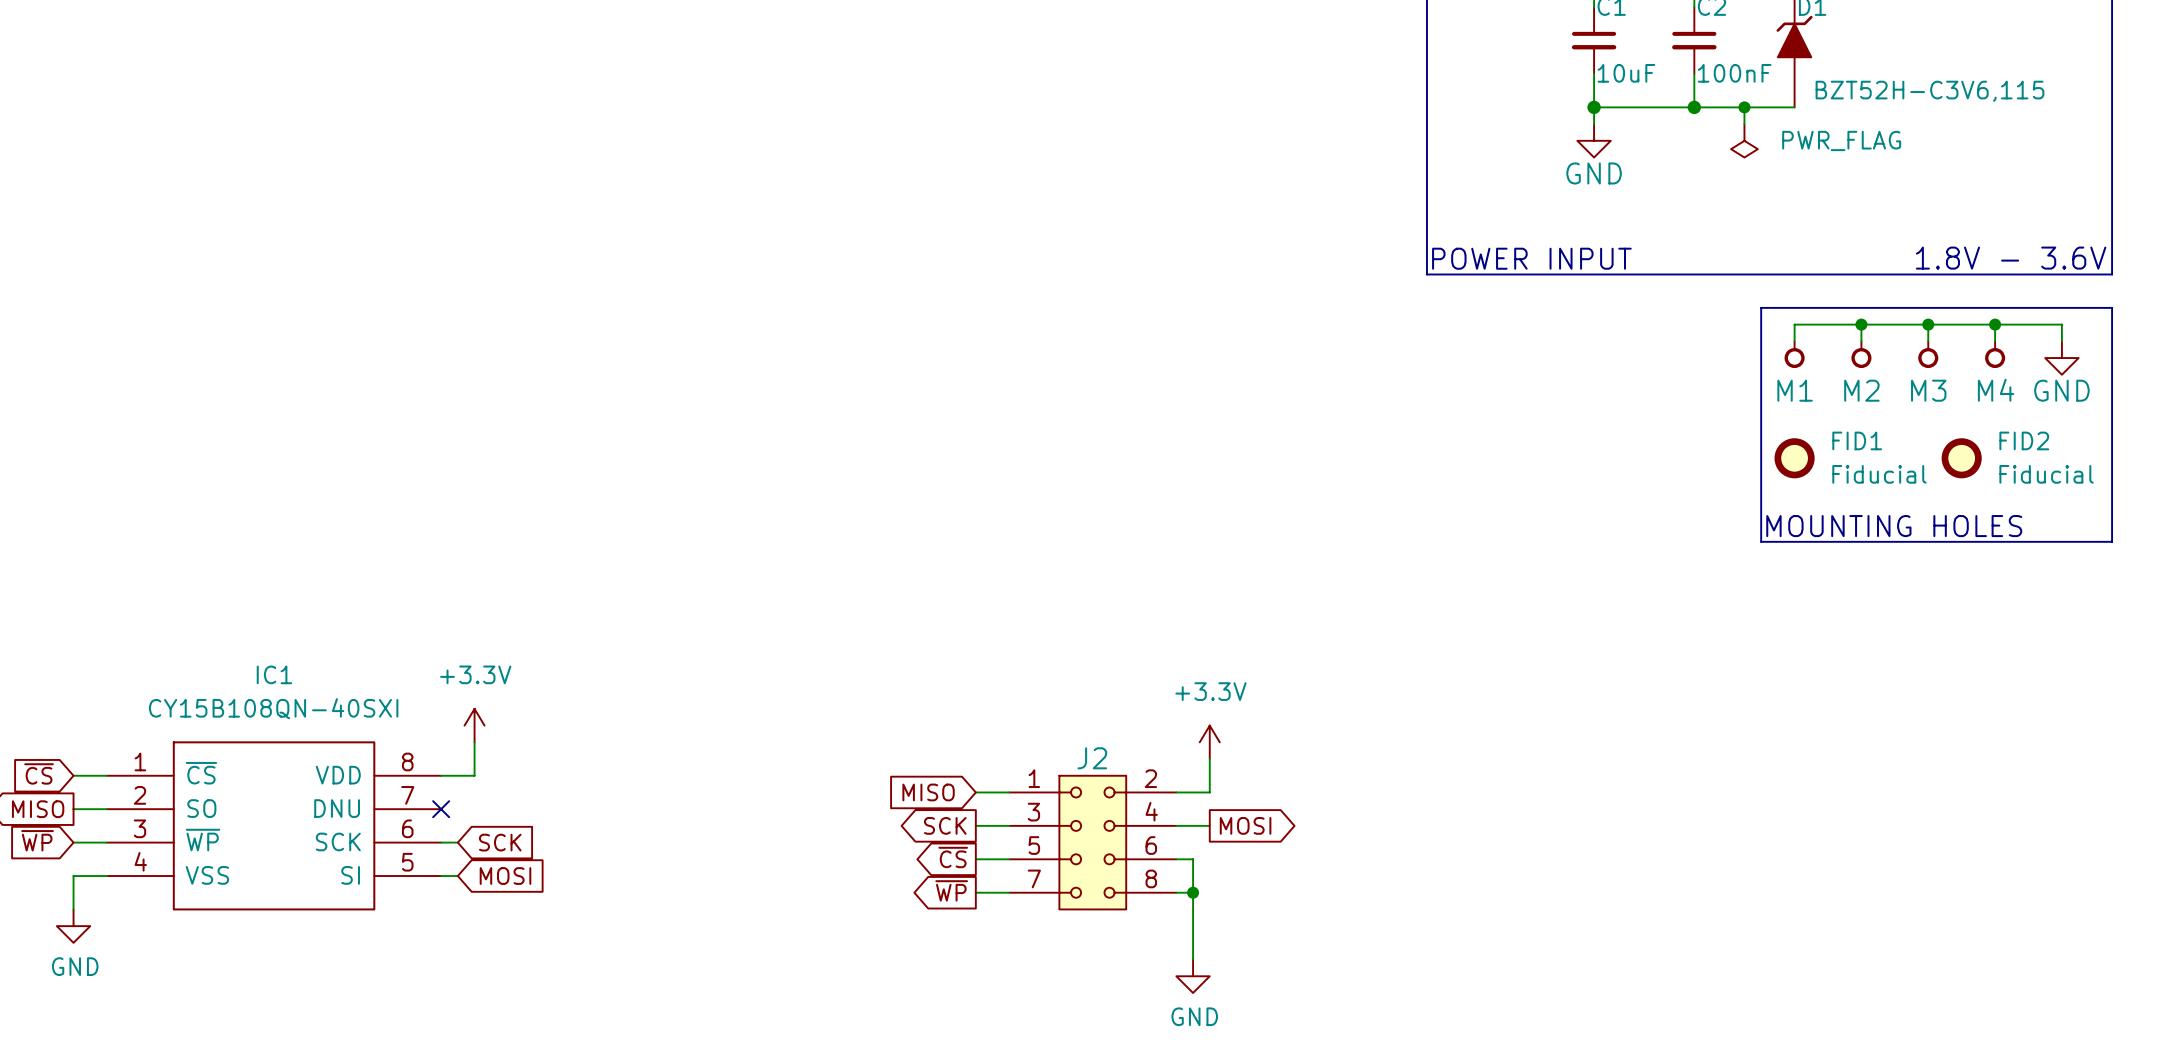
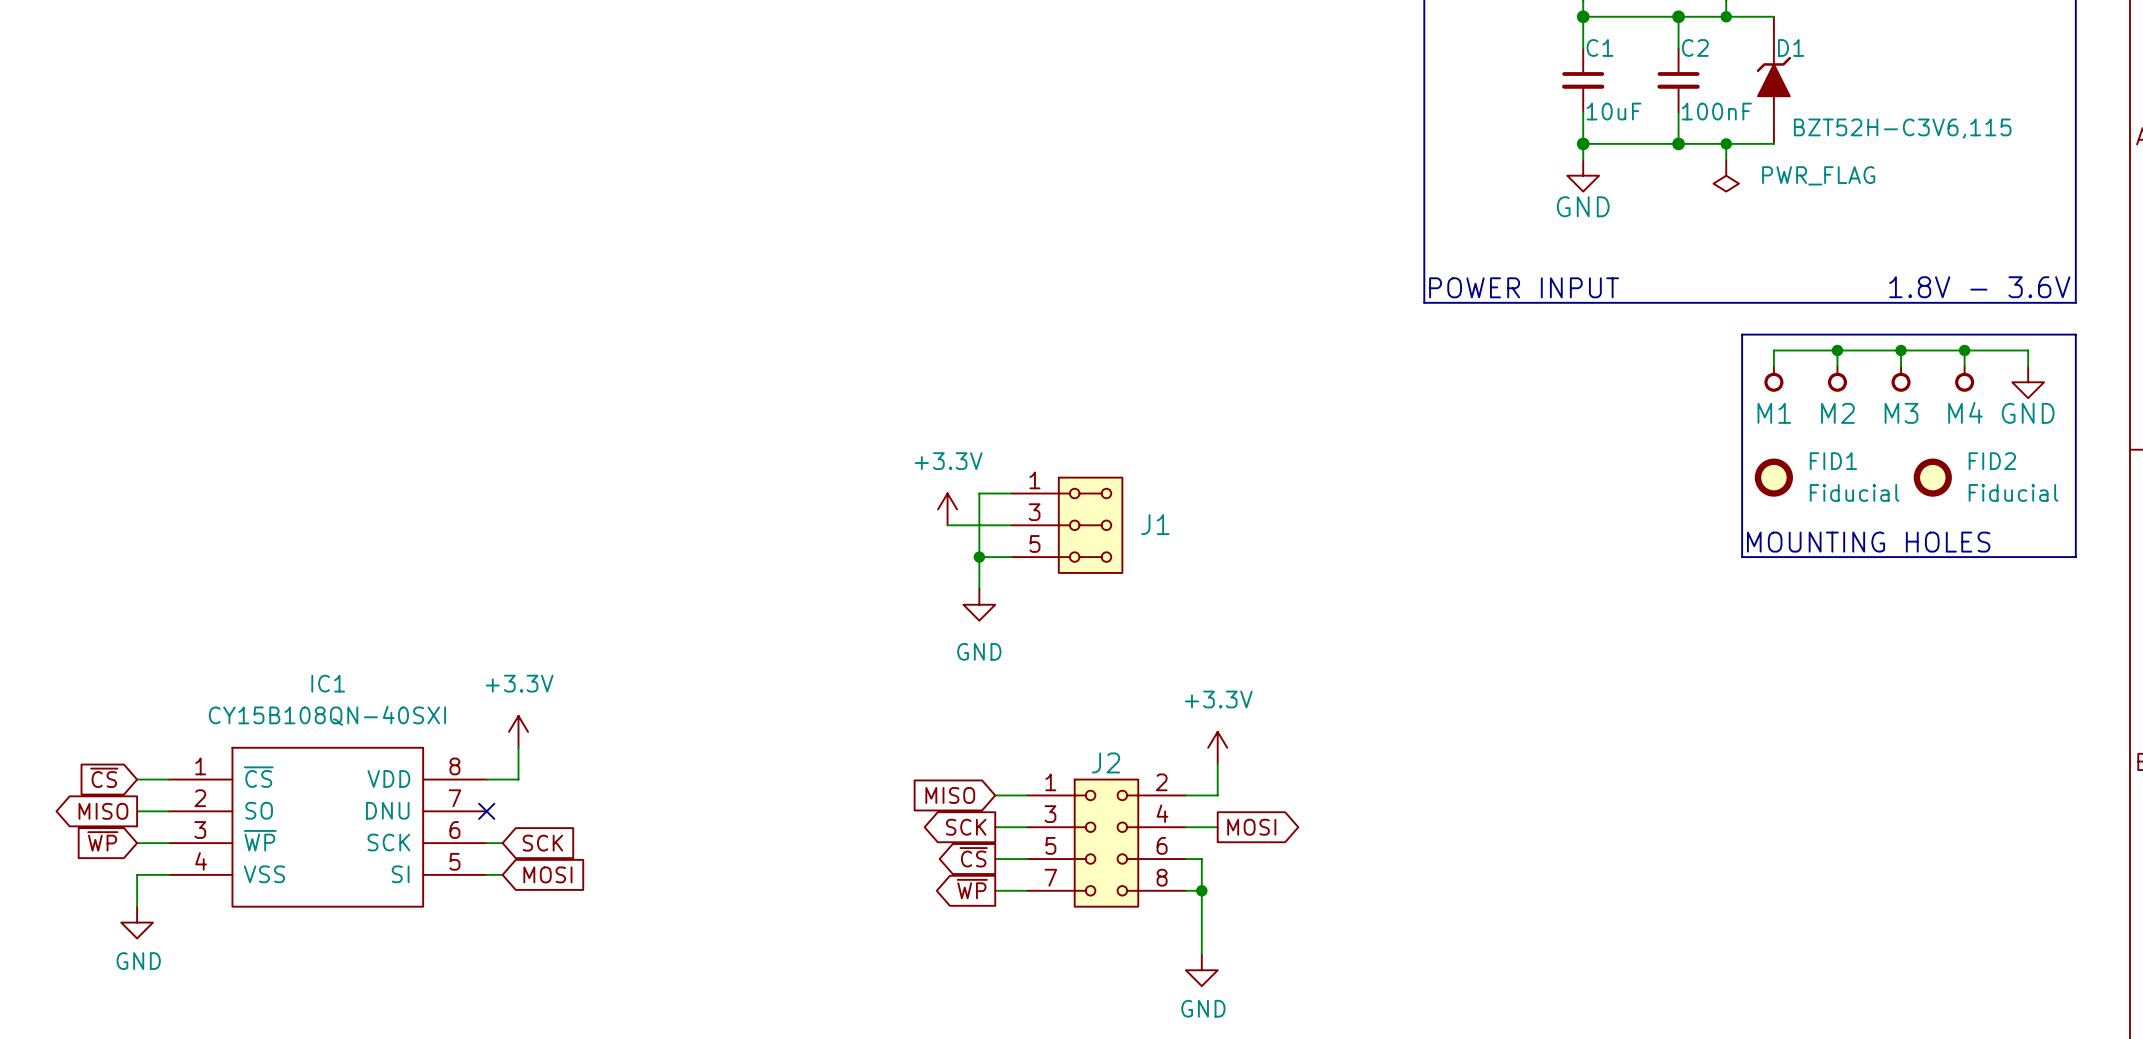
wire: none -> (1011, 493) (979, 493) (979, 588)
power symbol: none -> +3.3V (947, 509)
wire: none -> (947, 525) (1011, 525)
J1: none -> (1066, 525)
wire: none -> (979, 557) (1011, 557)
junction: none -> (979, 557)
power symbol: none -> GND (979, 604)

